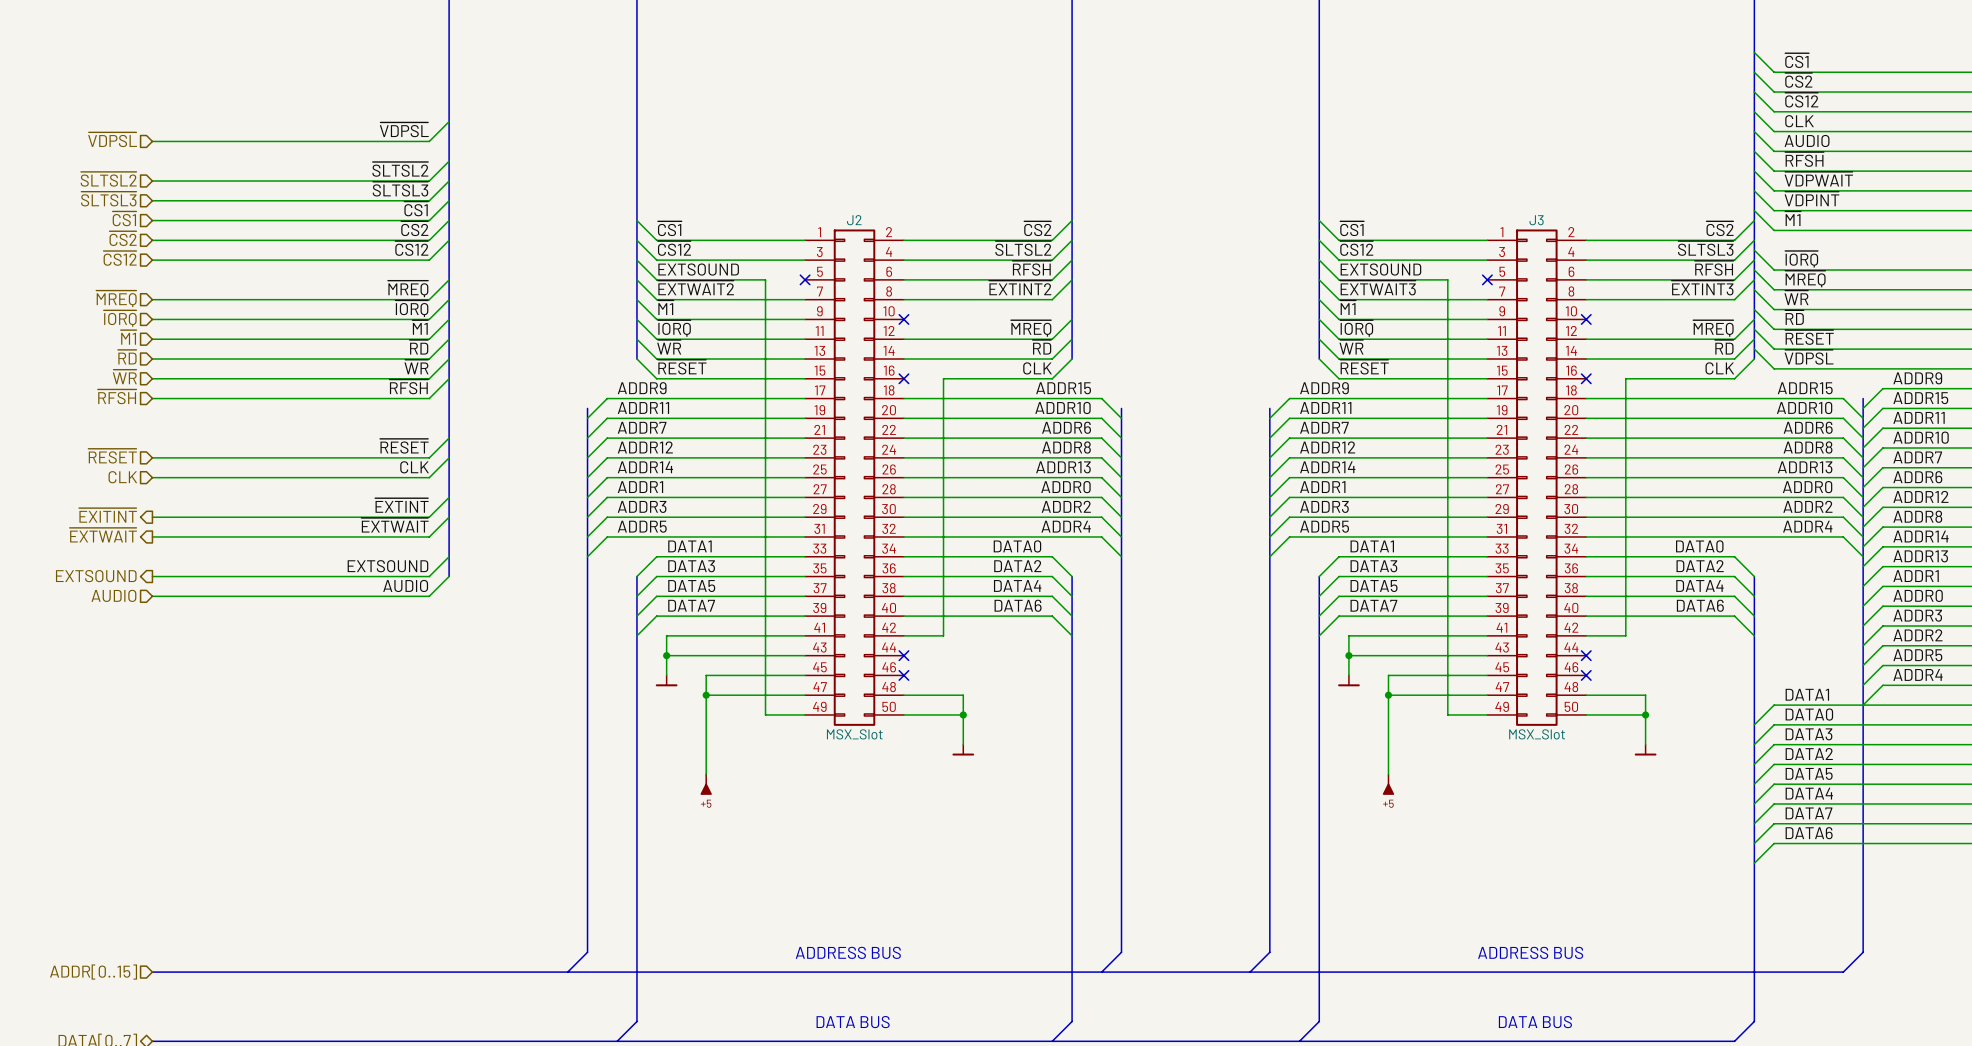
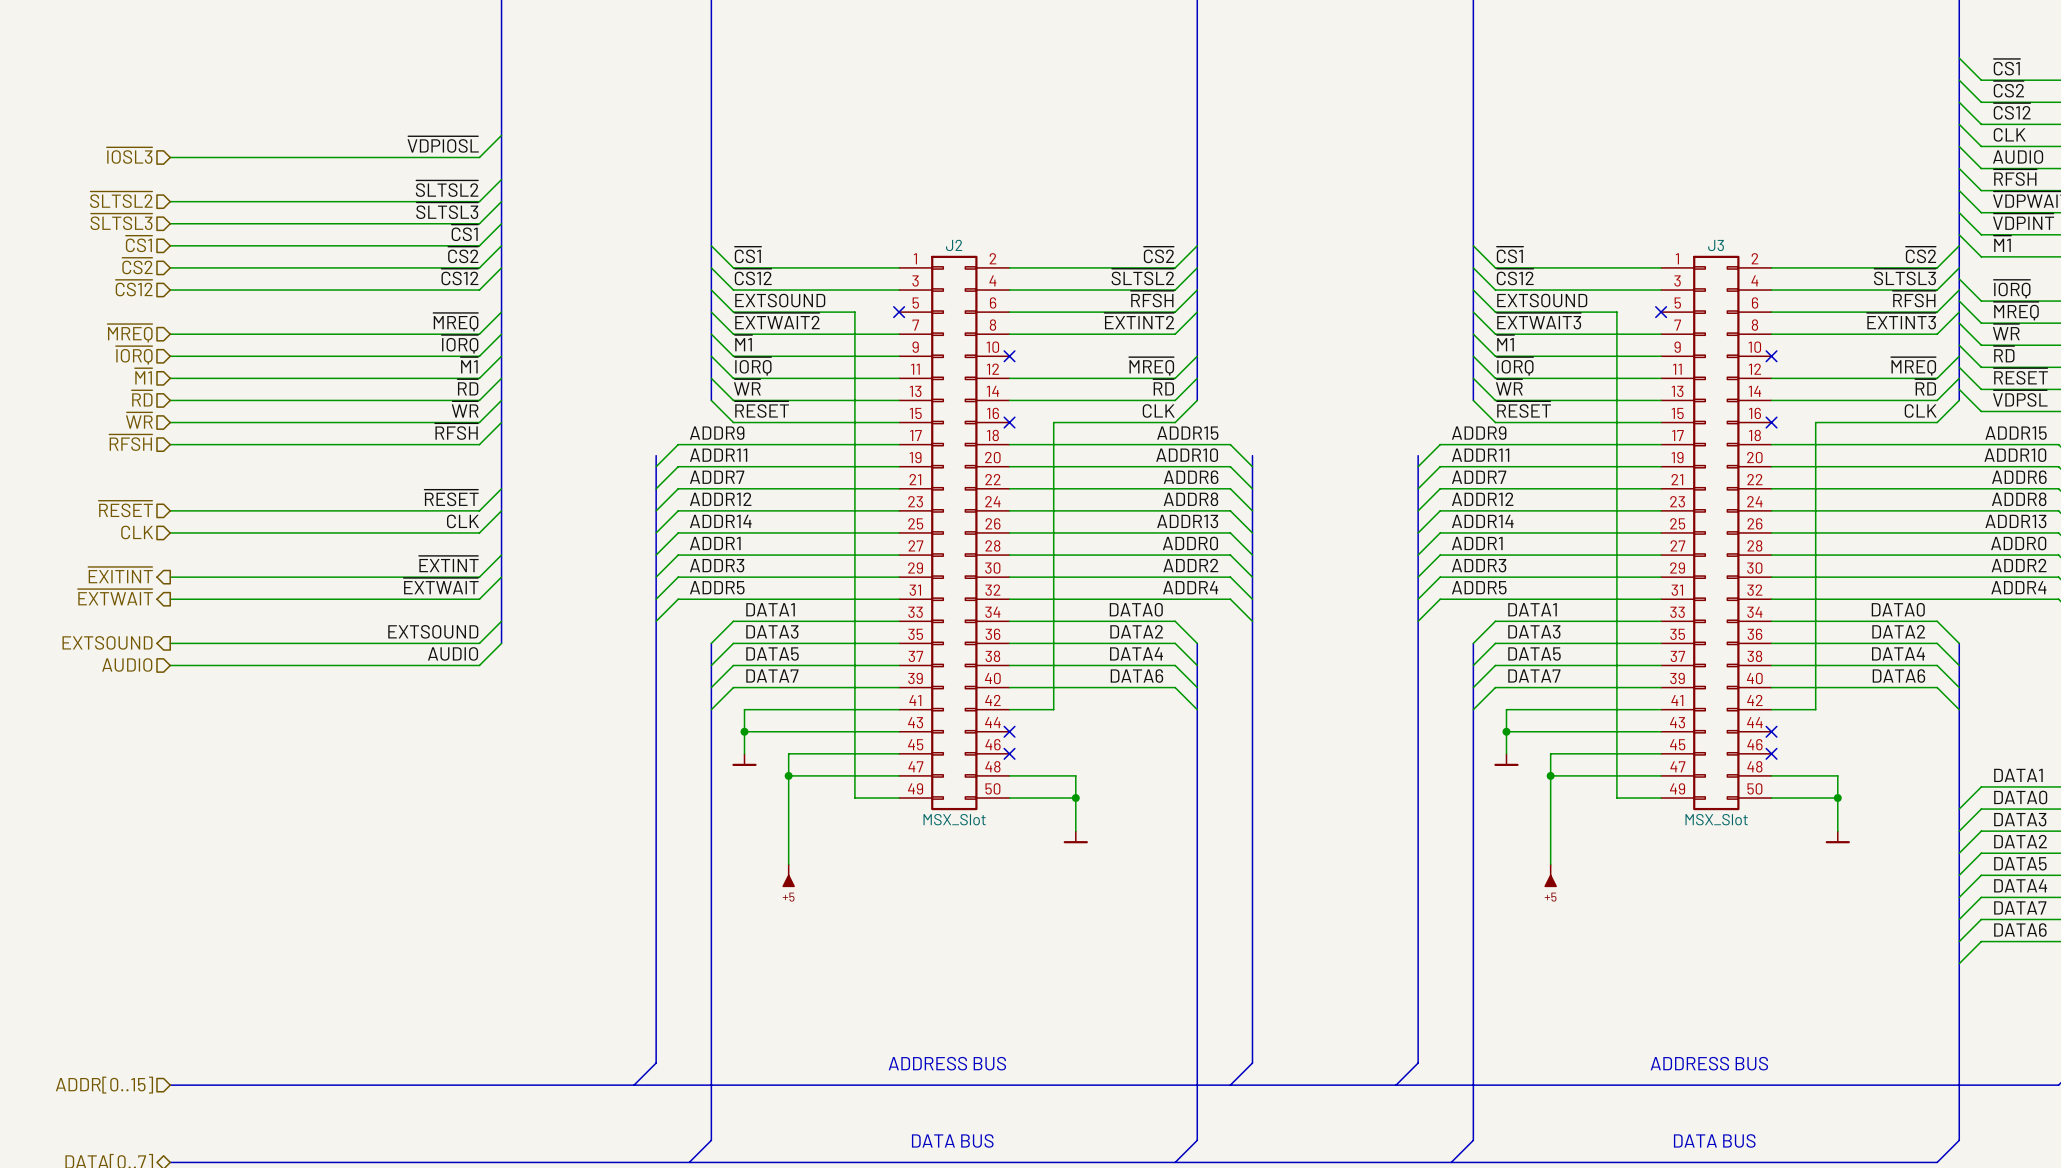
label: ~{VDPSL} (404, 129) -> ~{VDPIOSL} (443, 144)
hierarchical label: ~{VDPSL} (112, 139) -> ~{IOSL3} (129, 155)

